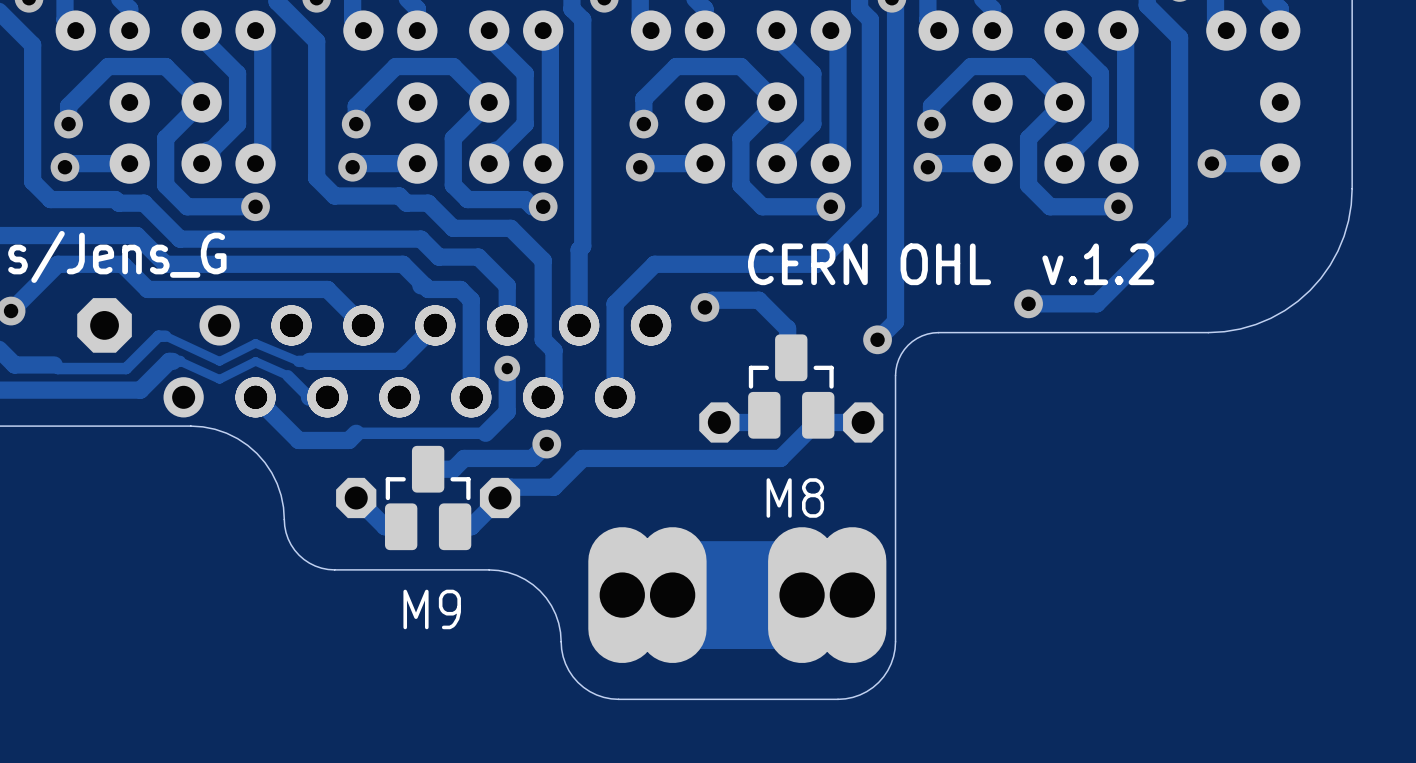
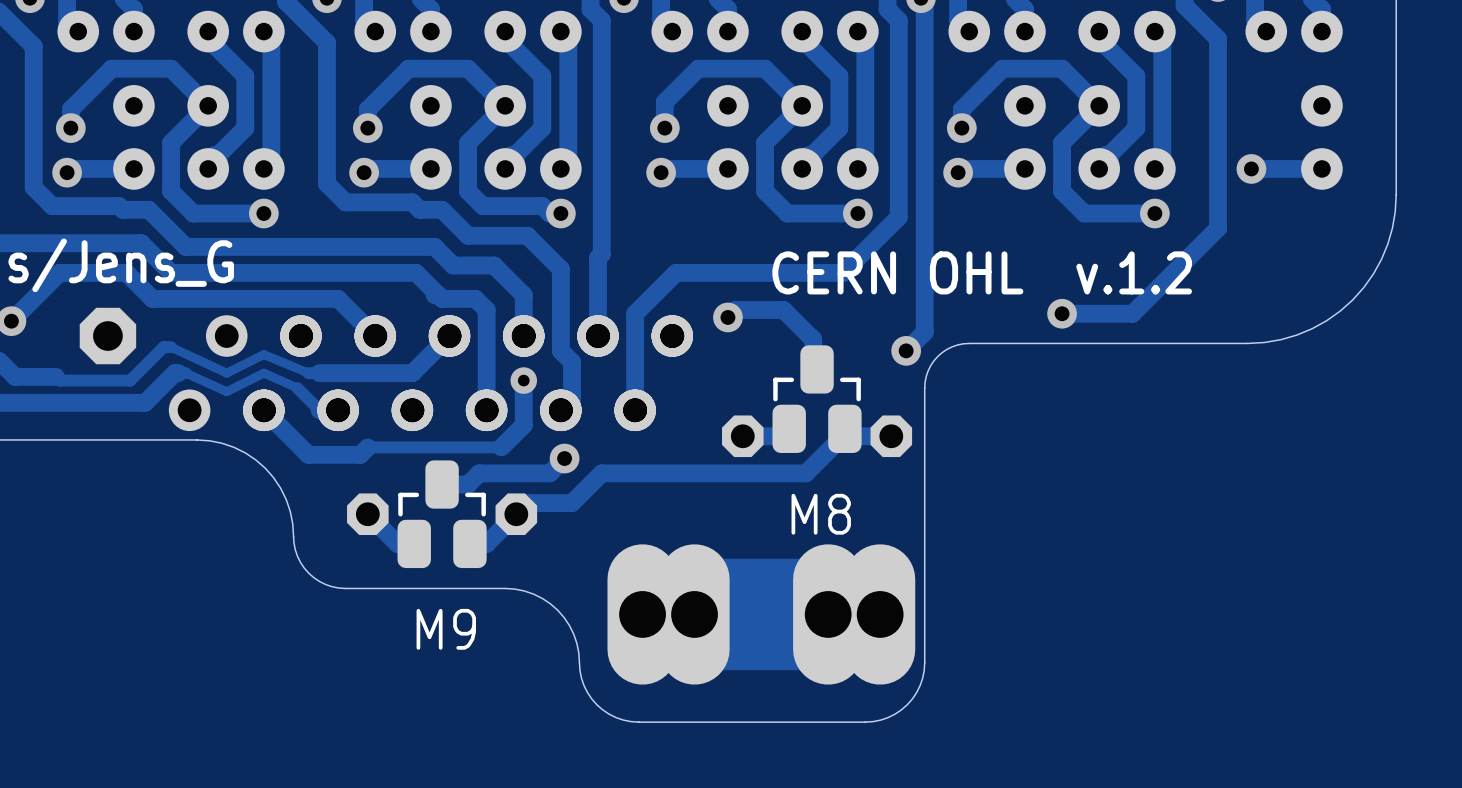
M8 footprint: [748, 334, 835, 439] -> [772, 345, 862, 453]
M9 footprint: [384, 445, 472, 551] -> [397, 460, 487, 569]

